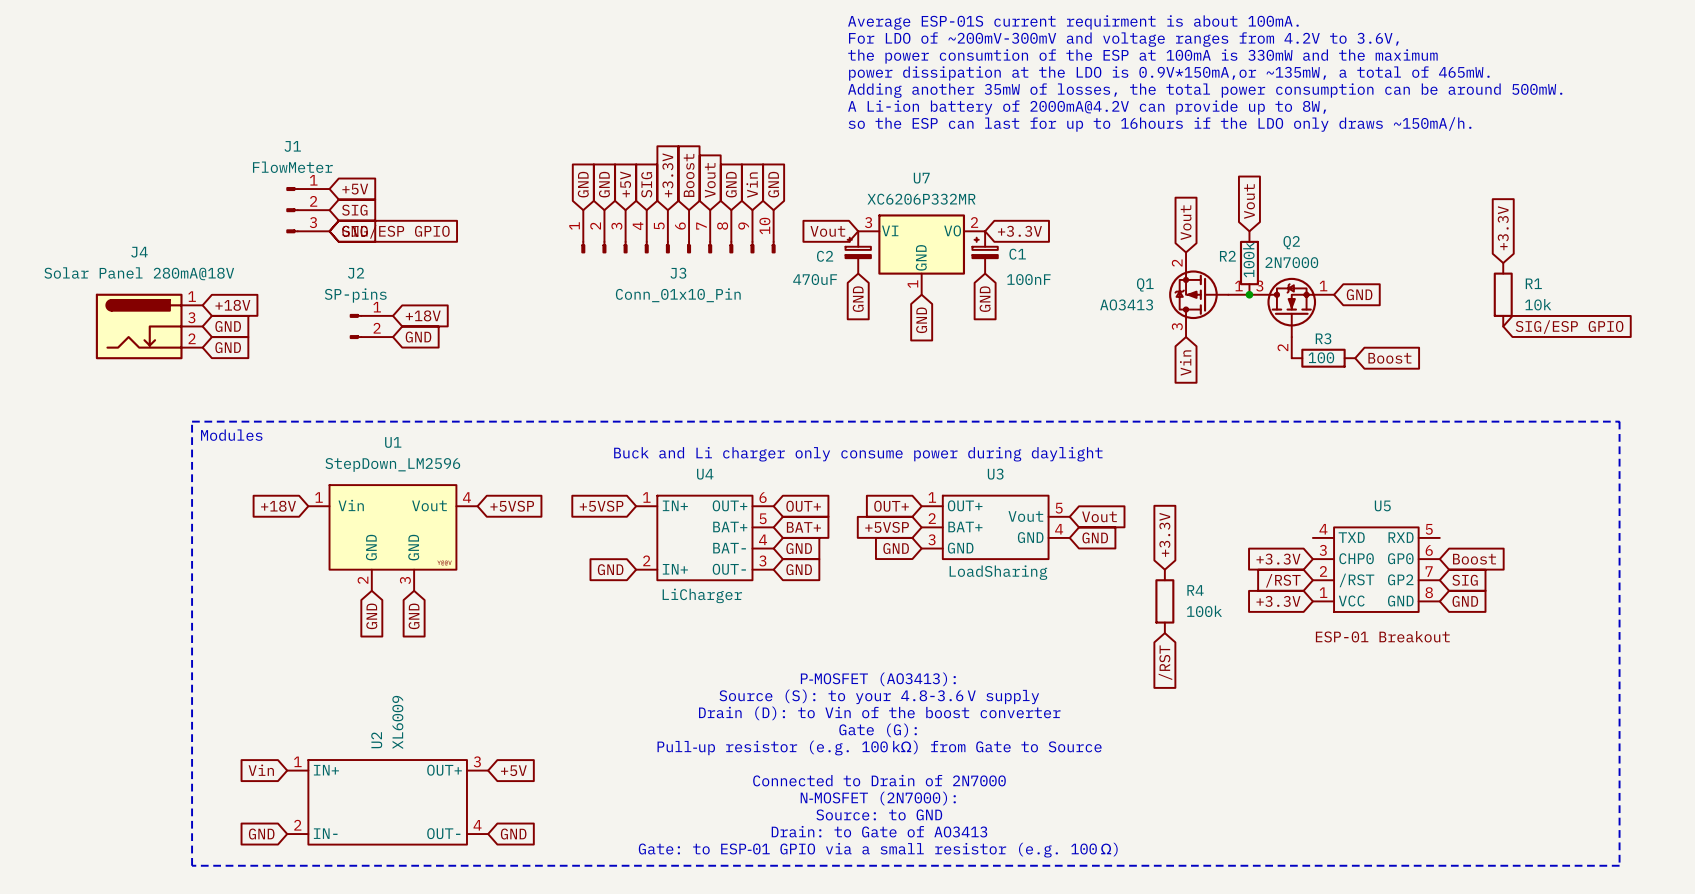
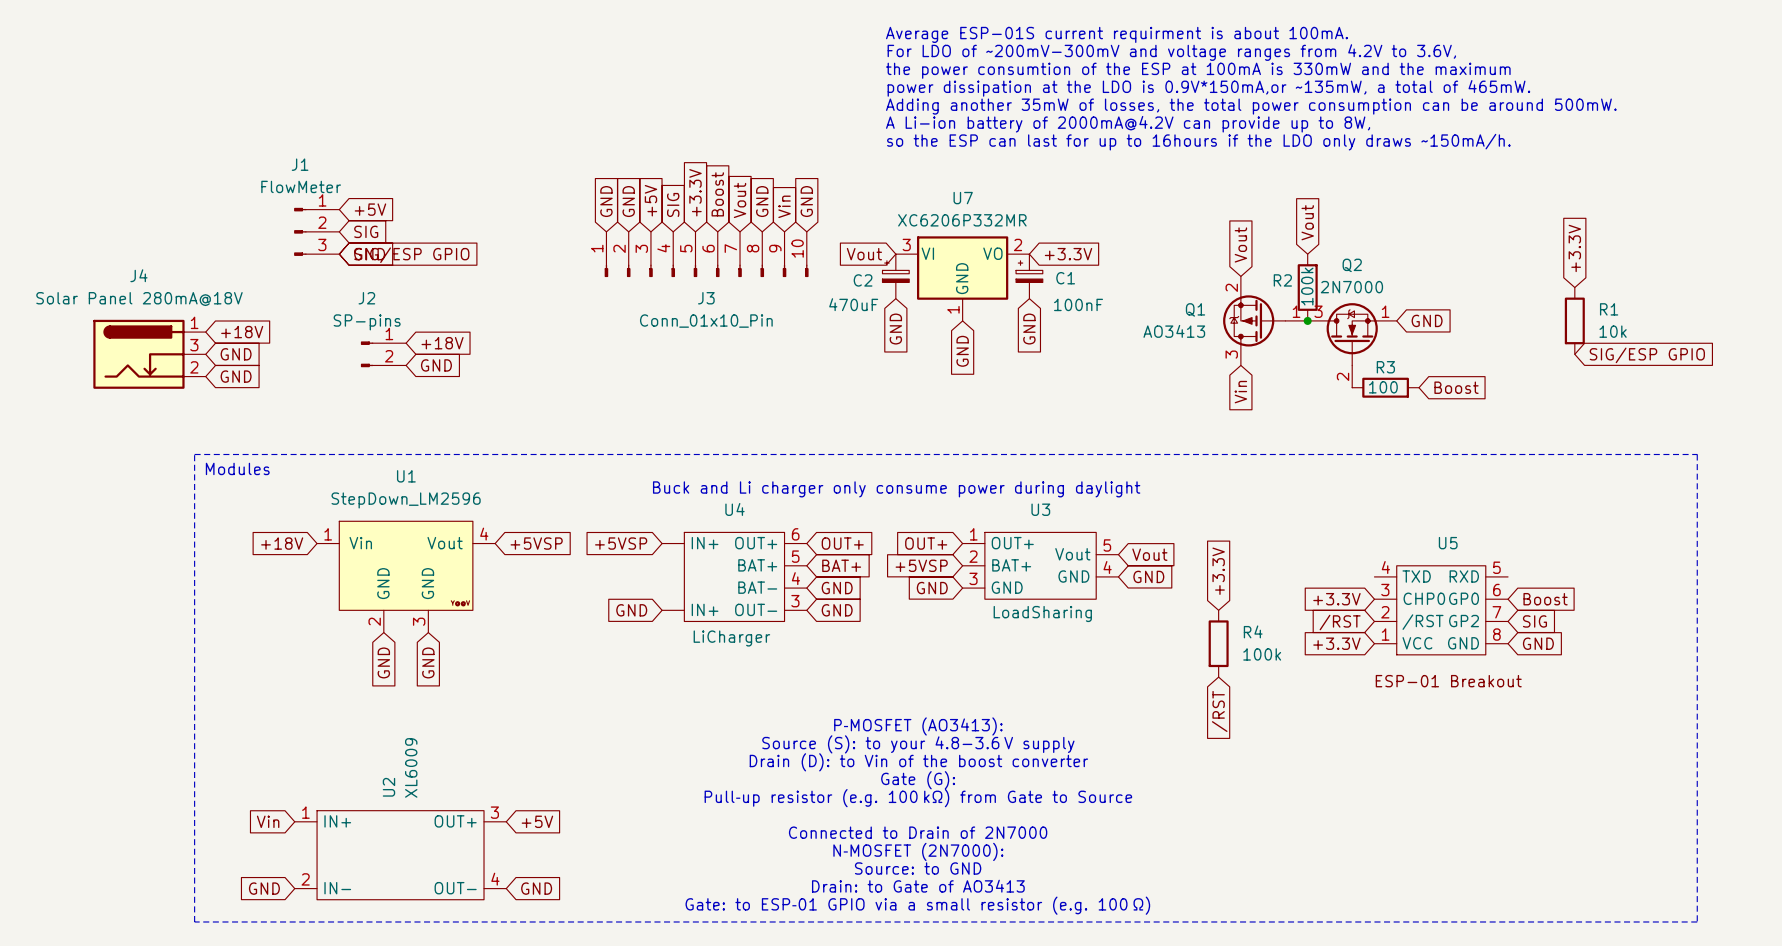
U4 pin number: 1 (646, 497) -> none
U4 pin number: 2 (646, 560) -> none

